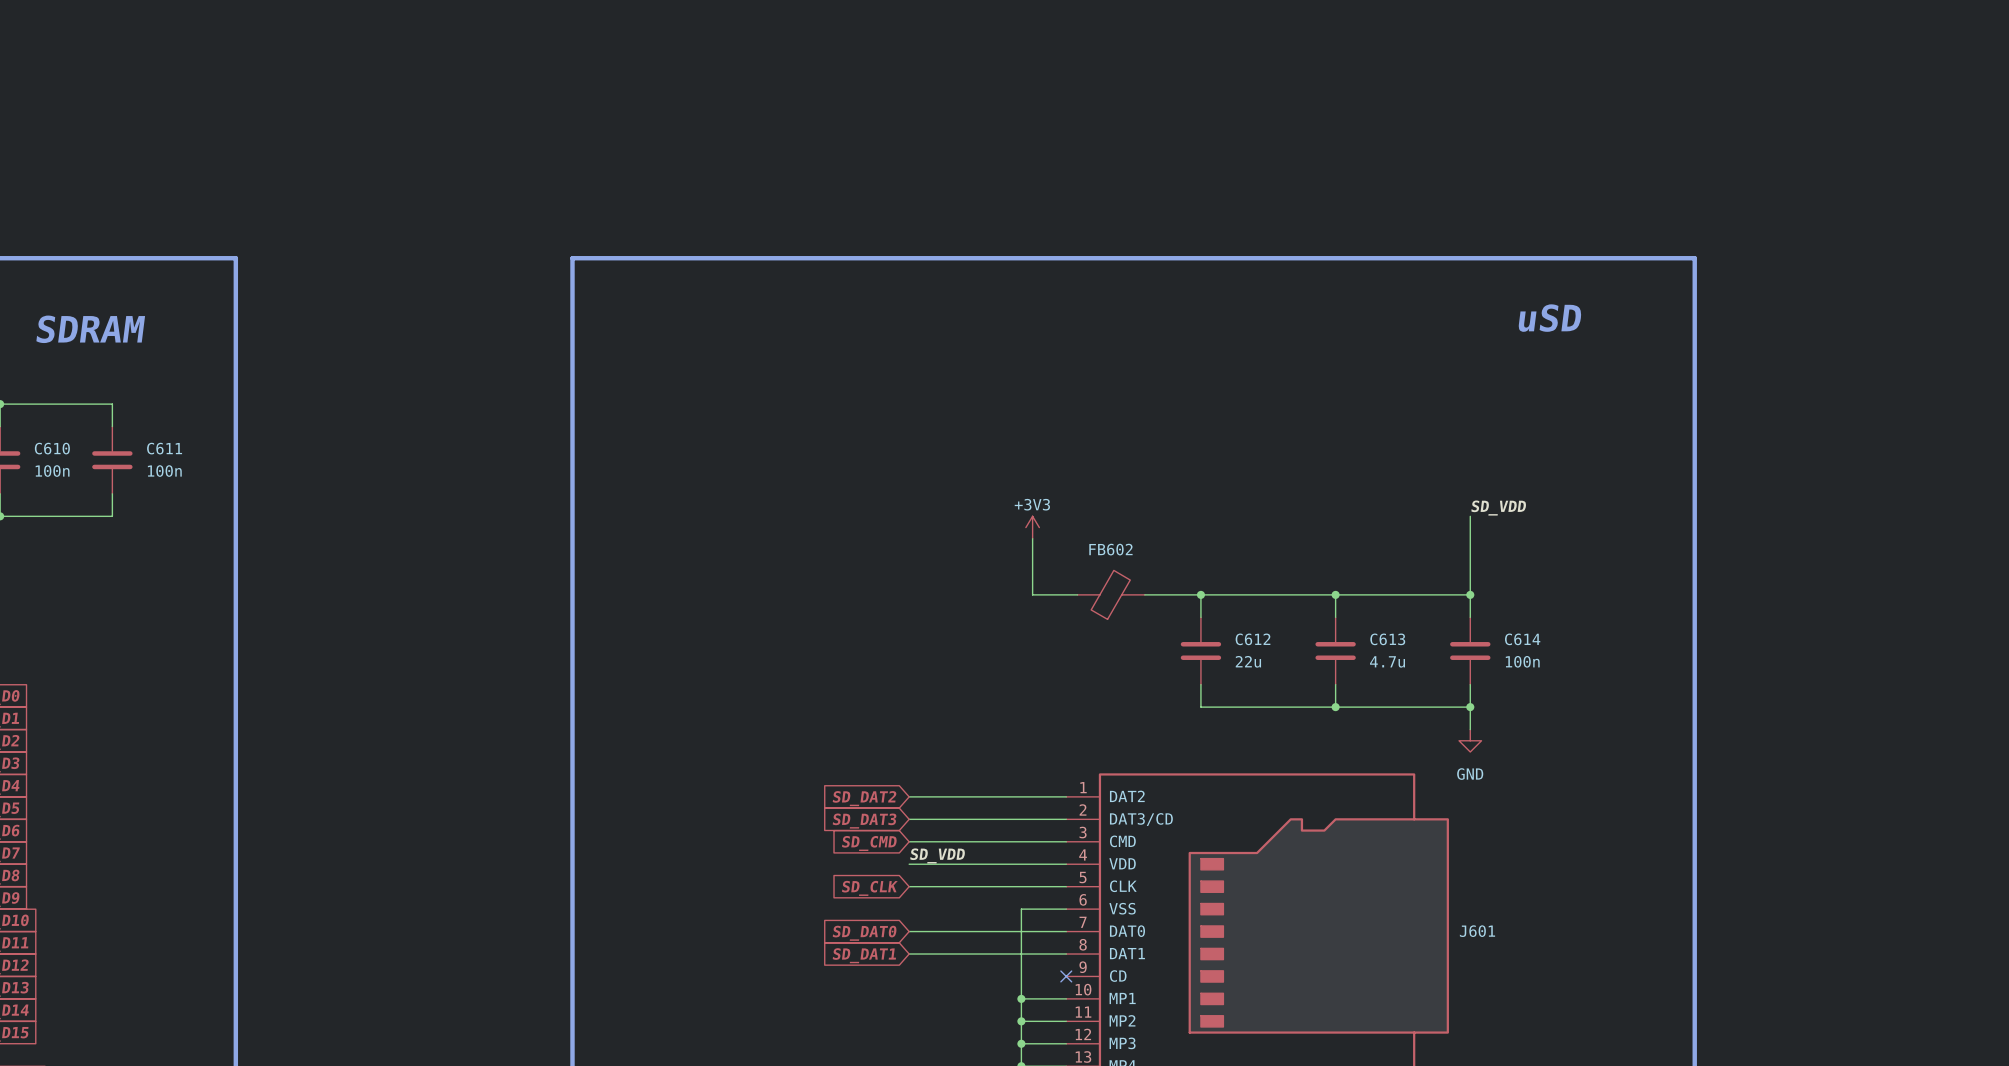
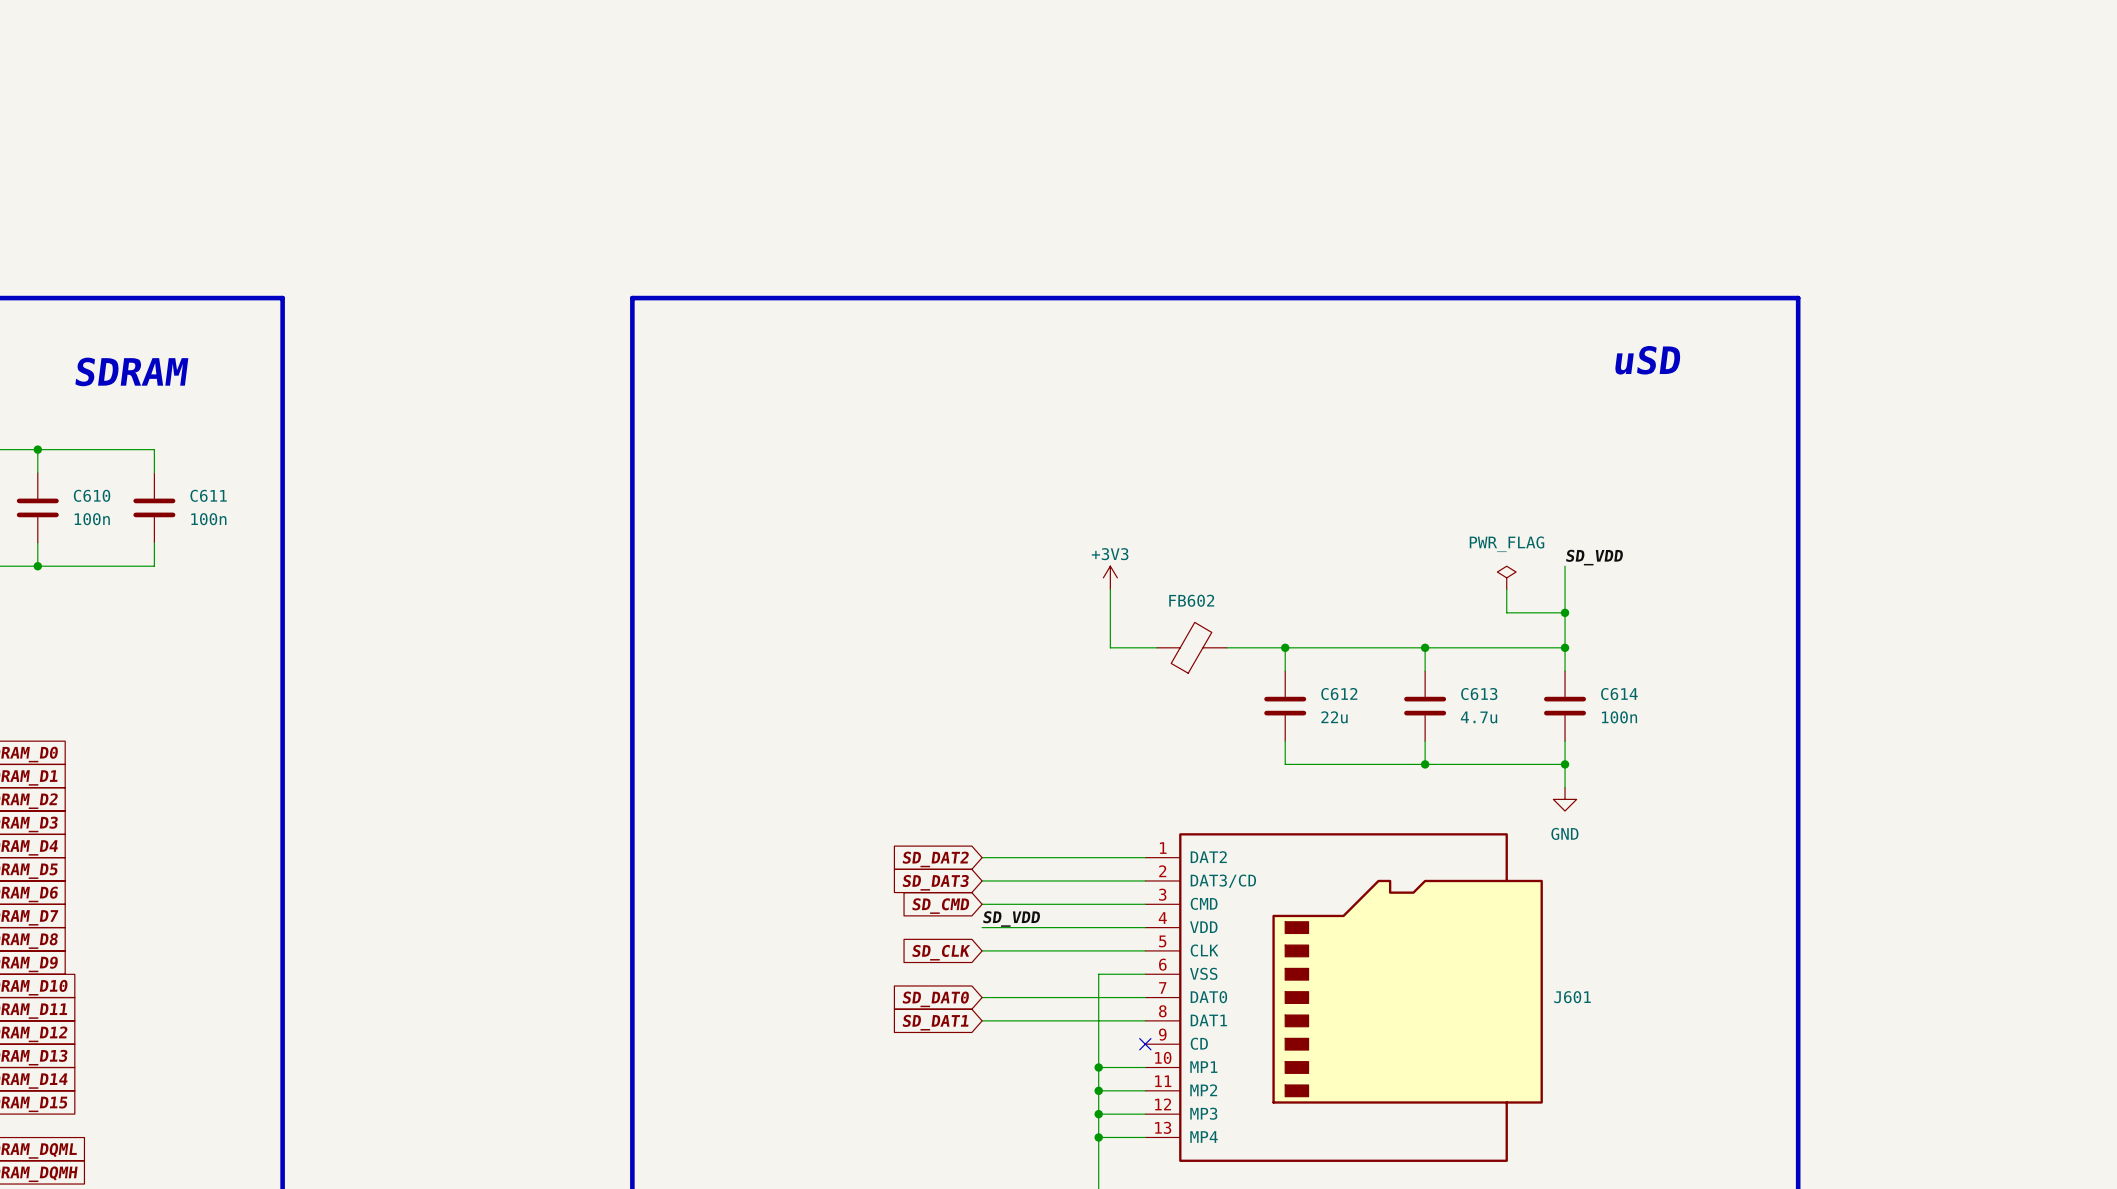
power symbol: none -> PWR_FLAG (1506, 577)
wire: none -> (1506, 589) (1506, 612) (1565, 612)
junction: none -> (1565, 612)

